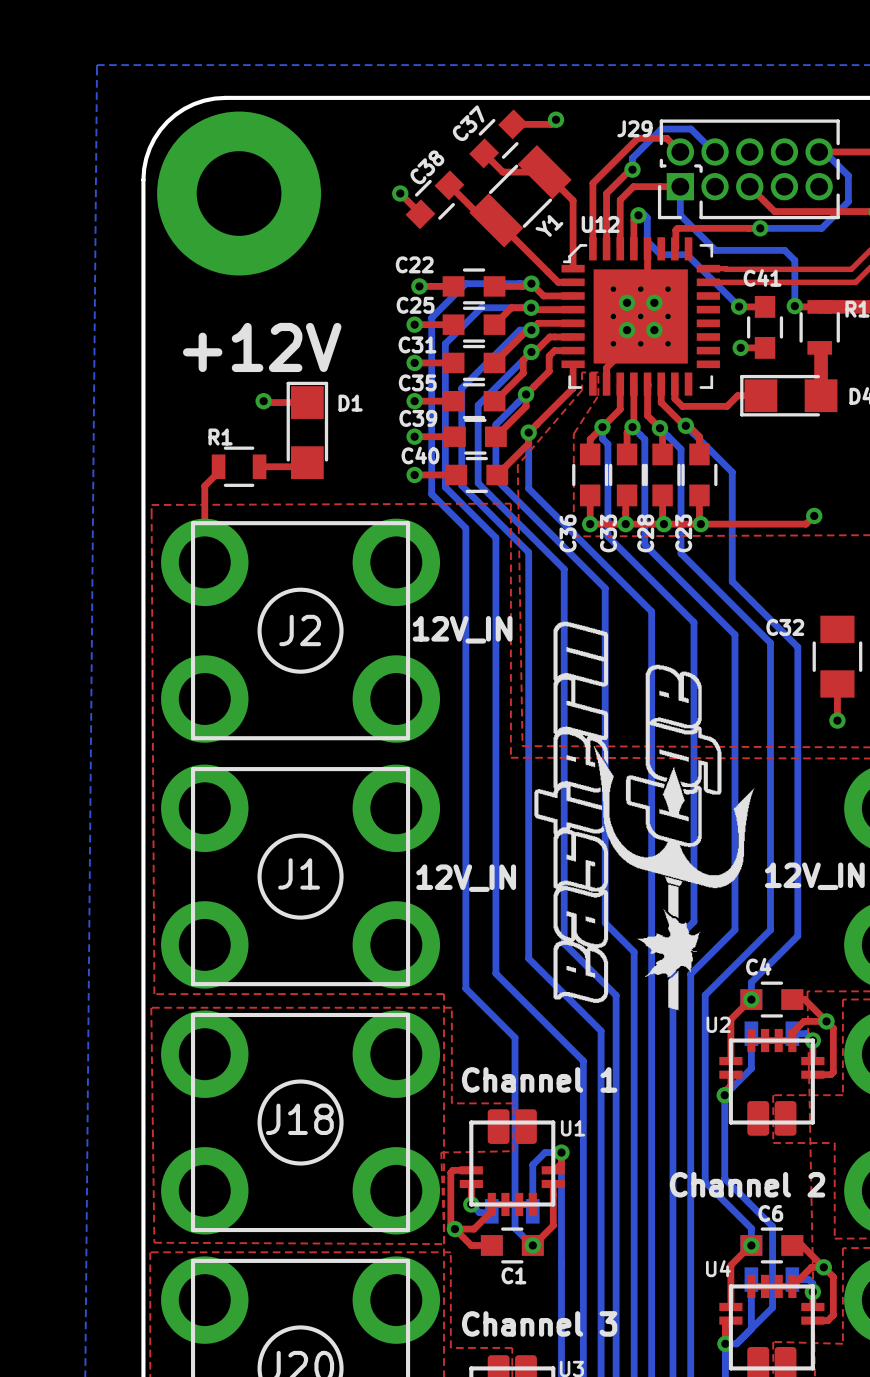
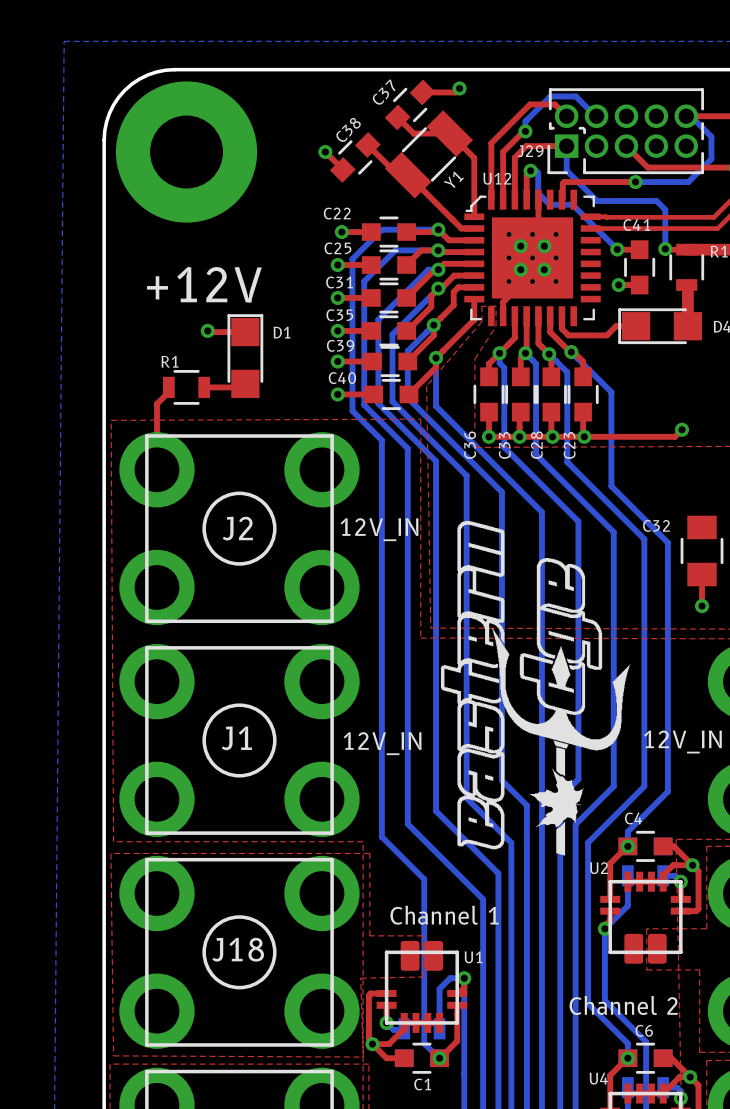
J29 name position: J29 (634, 128) -> J29 (530, 151)

